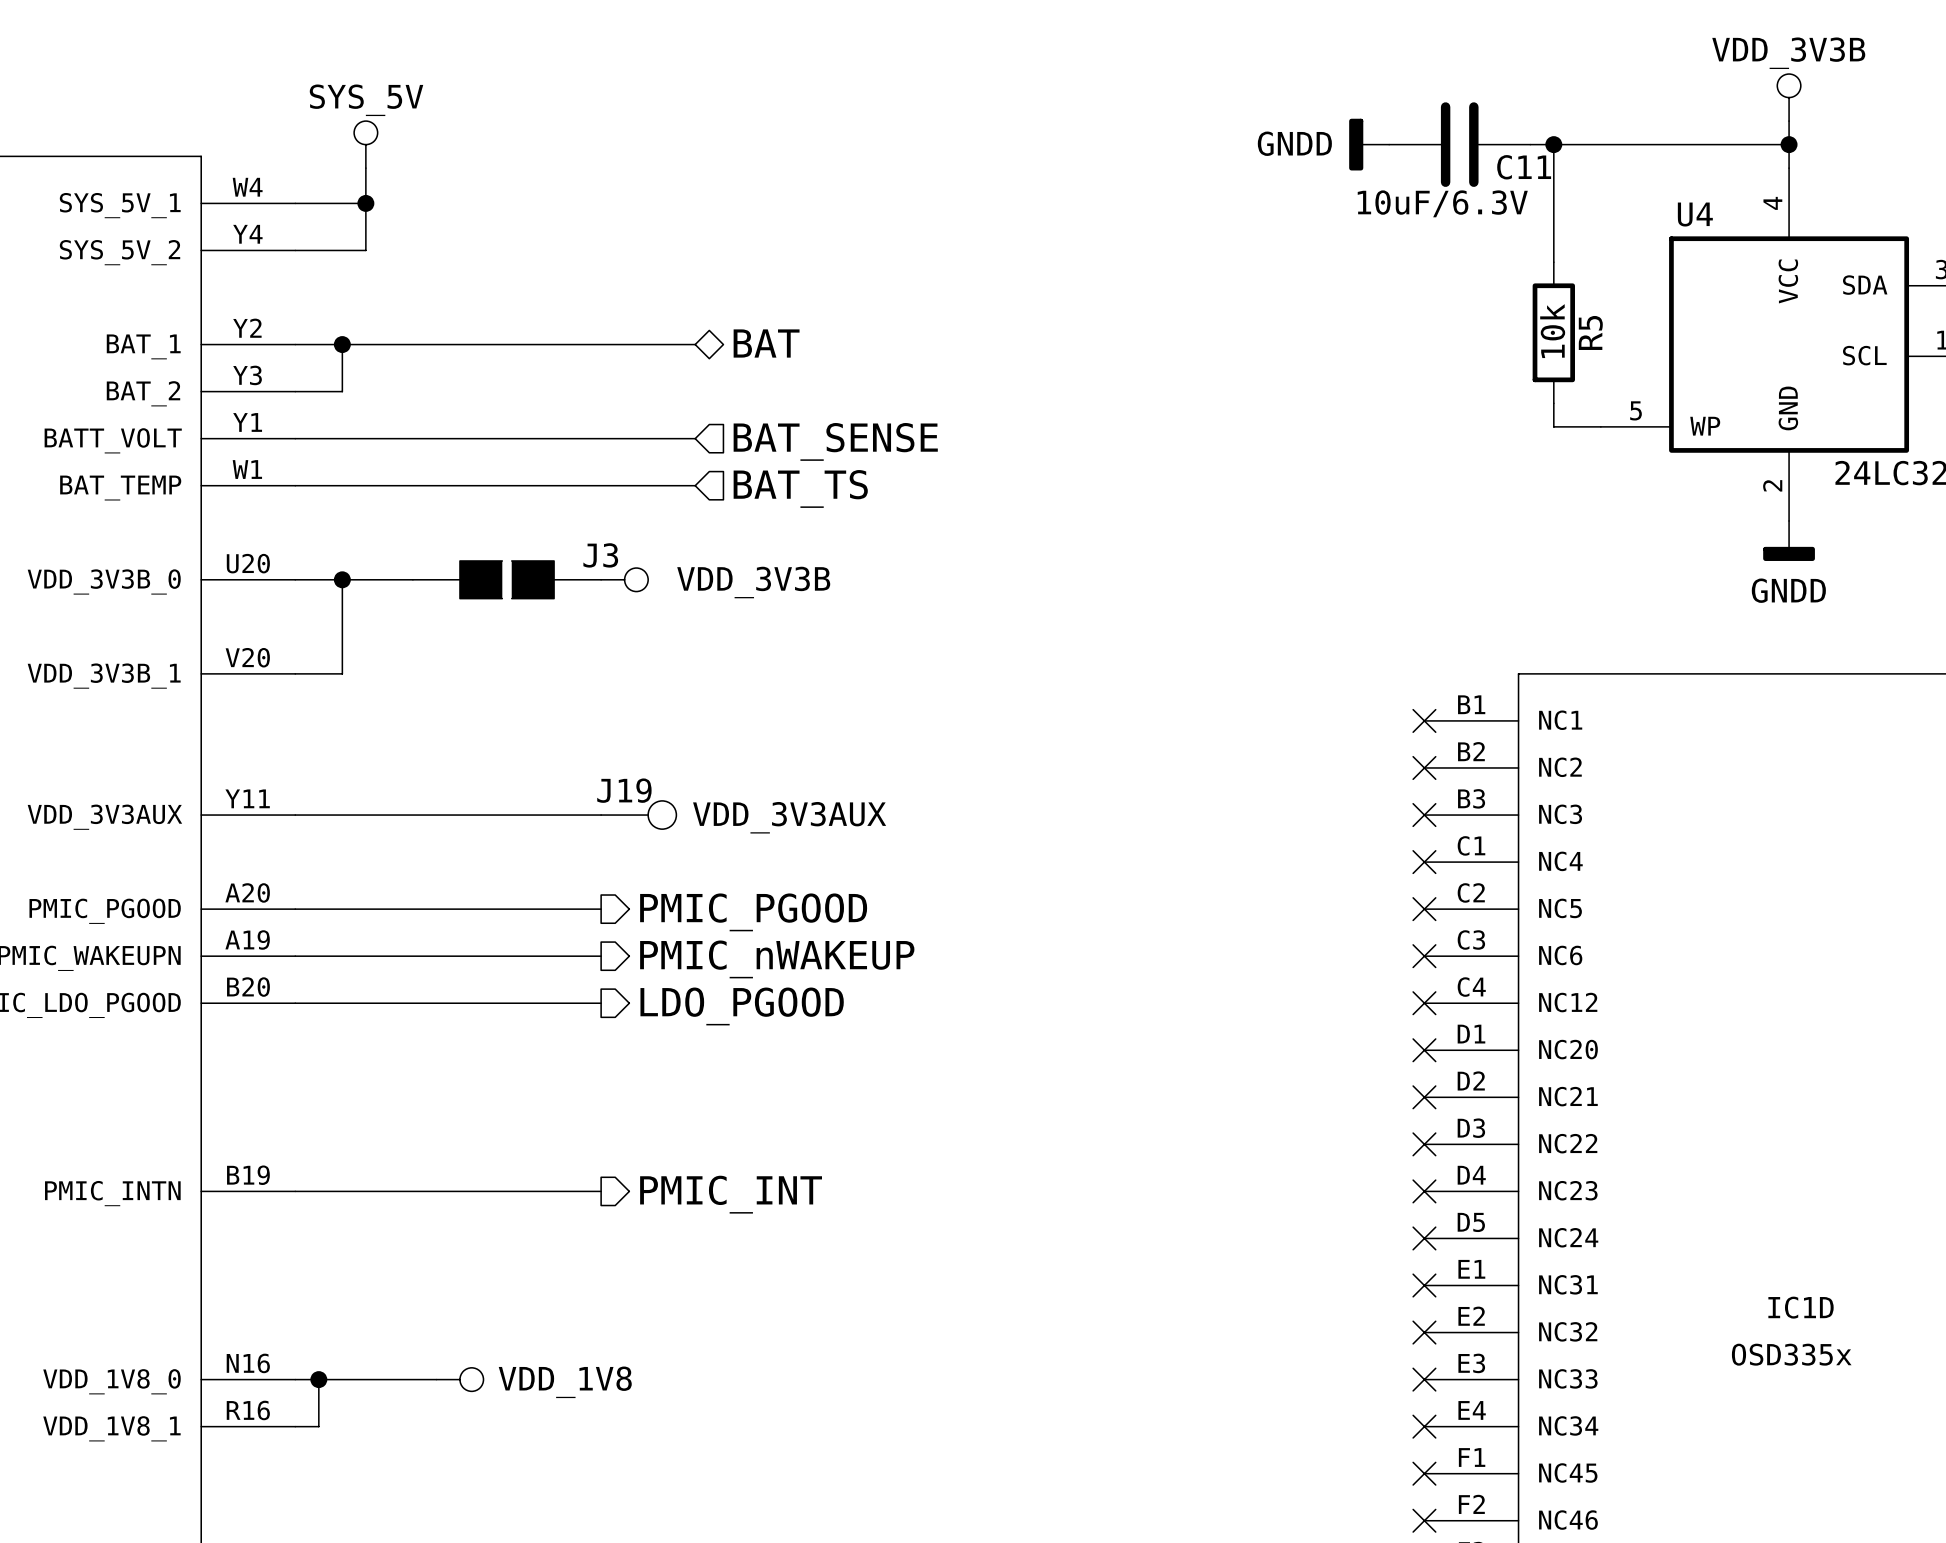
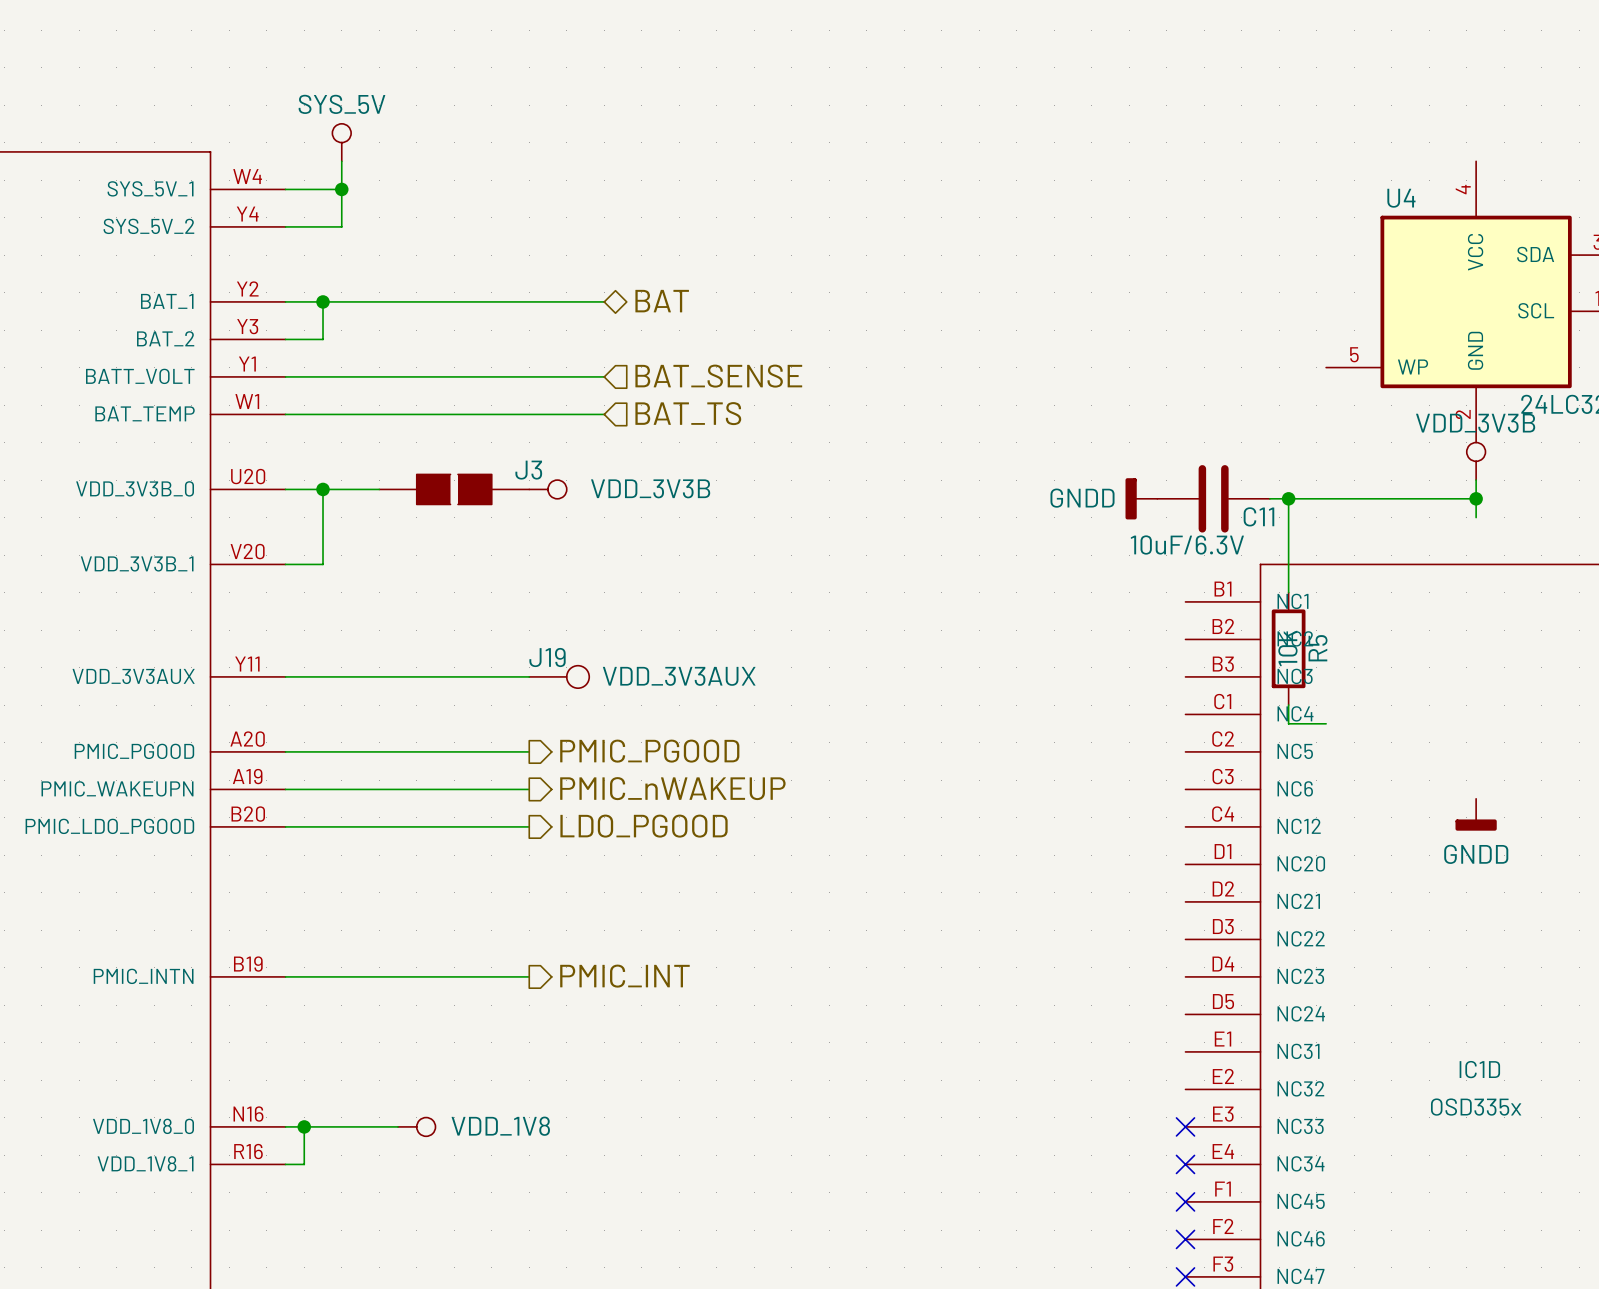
power symbol: VDD_3V3B (1789, 97) -> none
wire: (1789, 121) (1789, 168) -> (1476, 480) (1476, 517)
power symbol position: GNDD (1369, 144) -> GNDD (1141, 498)
C11 position: (1459, 144) -> (1213, 498)
wire: (1530, 144) (1789, 144) -> (1269, 498) (1476, 498)
wire: (1553, 144) (1553, 262) -> (1288, 498) (1288, 592)
junction: (1553, 144) -> none
junction: (1789, 144) -> none
R5 position: (1553, 332) -> (1288, 648)
wire: (1553, 403) (1553, 426) (1600, 426) -> (1288, 705) (1288, 723) (1326, 723)
power symbol: GNDD (1789, 540) -> VDD_3V3B (1476, 461)
junction: none -> (1288, 498)
junction: none -> (1476, 498)
no-connect mark: (1424, 720) -> none
no-connect mark: (1424, 767) -> none
no-connect mark: (1424, 815) -> none
no-connect mark: (1424, 862) -> none
no-connect mark: (1424, 909) -> none
no-connect mark: (1424, 956) -> none
power symbol: none -> GNDD (1476, 814)
no-connect mark: (1424, 1003) -> none
no-connect mark: (1424, 1050) -> none
no-connect mark: (1424, 1097) -> none
no-connect mark: (1424, 1144) -> none
no-connect mark: (1424, 1191) -> none
no-connect mark: (1424, 1238) -> none
no-connect mark: (1424, 1285) -> none
no-connect mark: (1424, 1332) -> none

